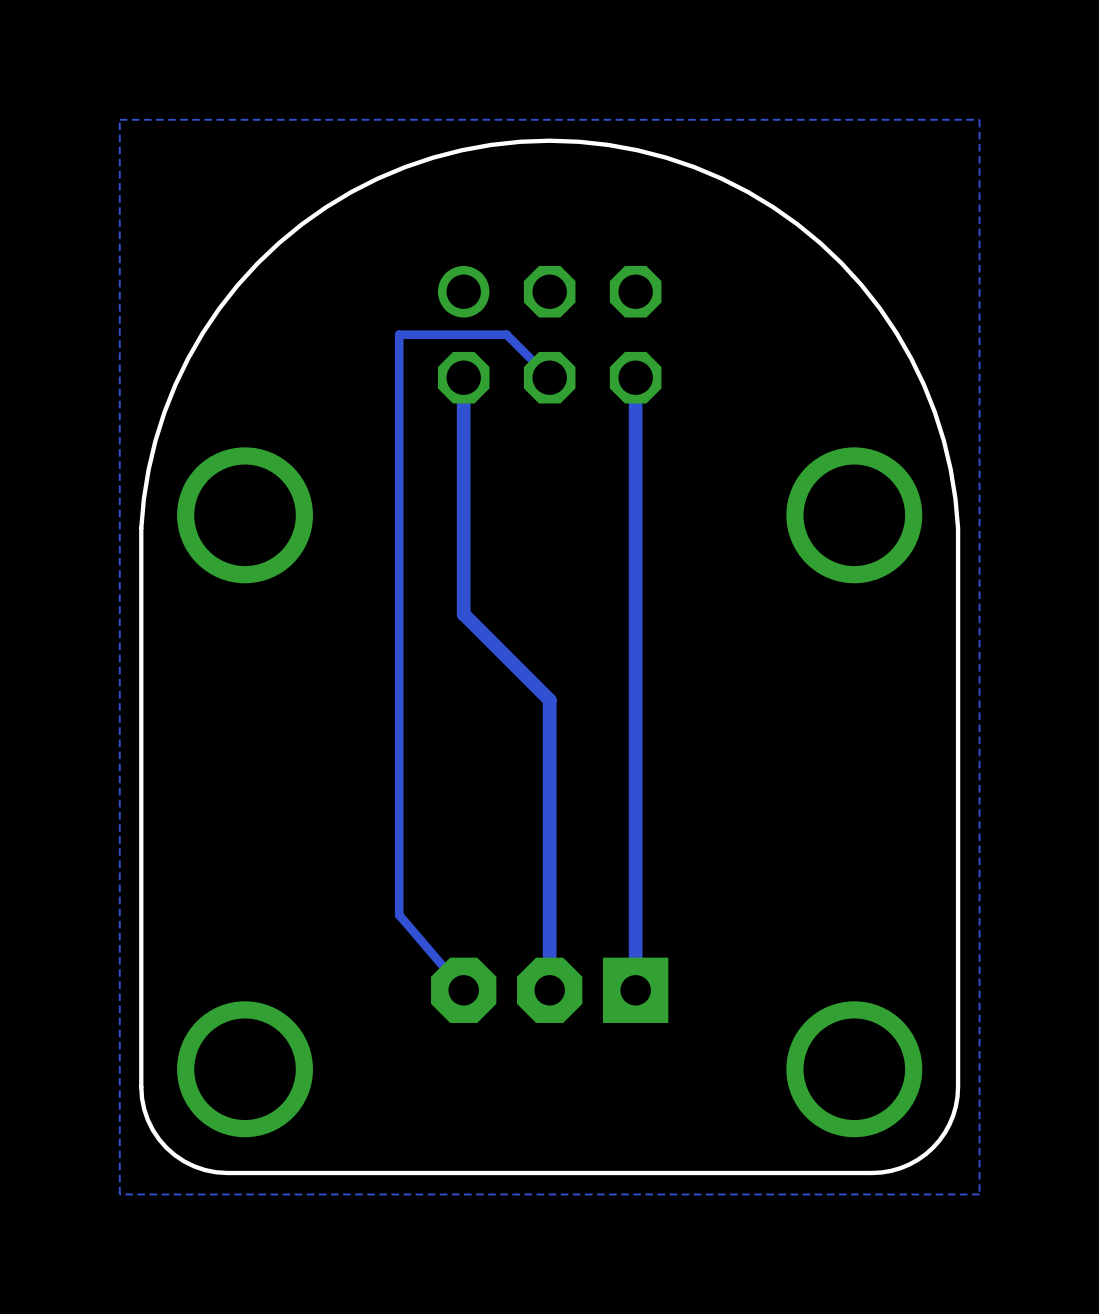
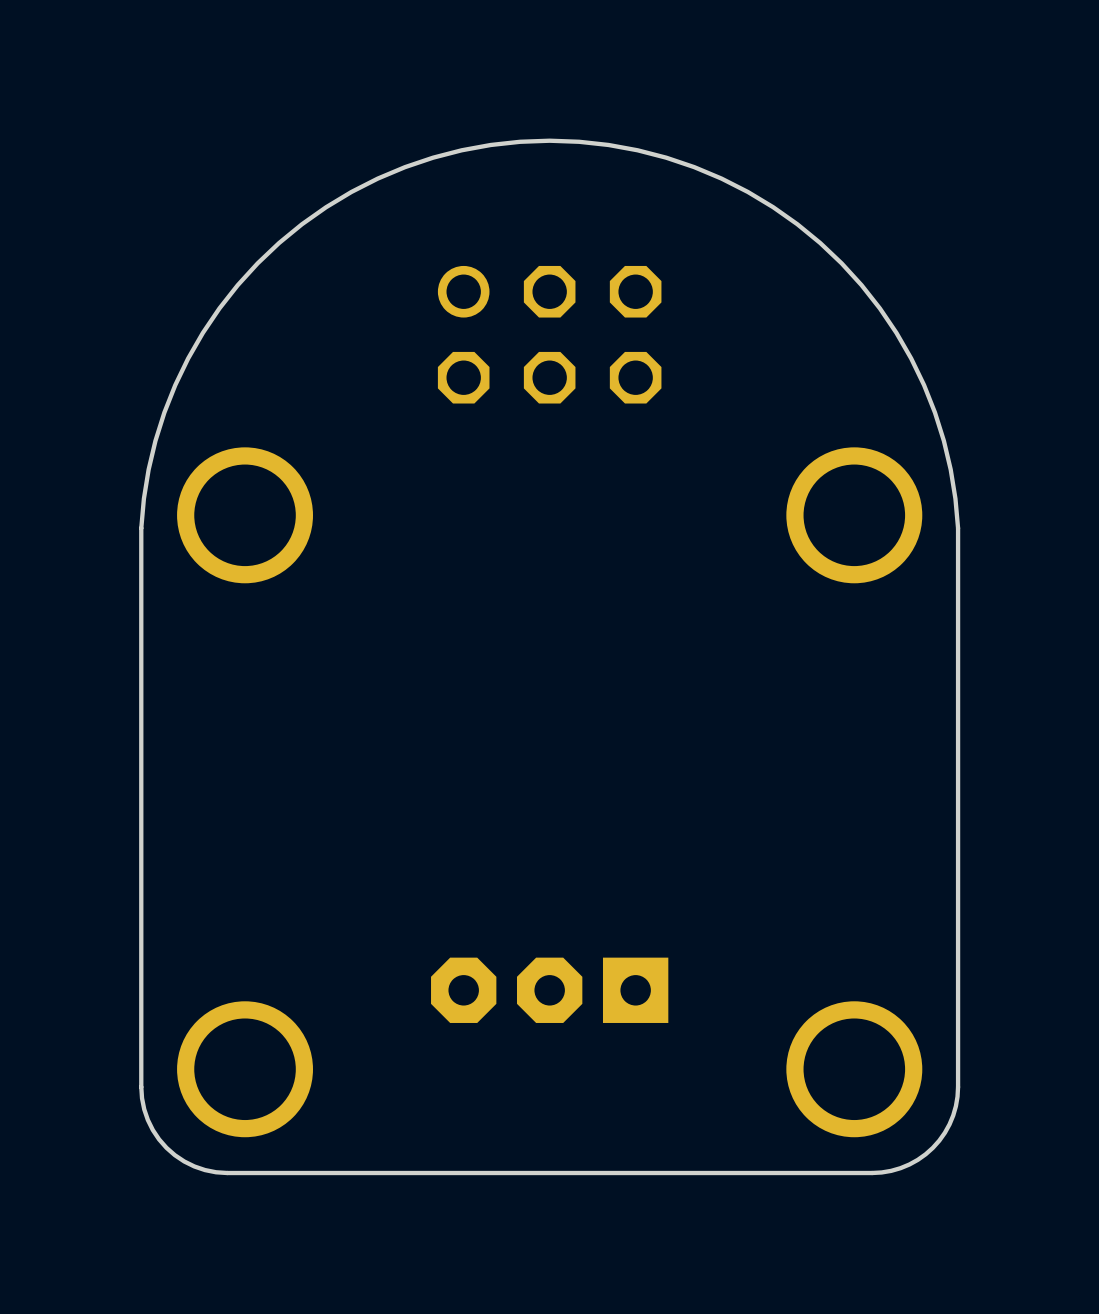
zone outline: (979, 119) (119, 119) (119, 1194) (979, 1194) (979, 119) -> none
track: (463, 377) (463, 614) (549, 700) (549, 990) -> none
track: (549, 377) (506, 334) (399, 334) (399, 915) (463, 990) -> none
track: (635, 377) (635, 990) -> none

